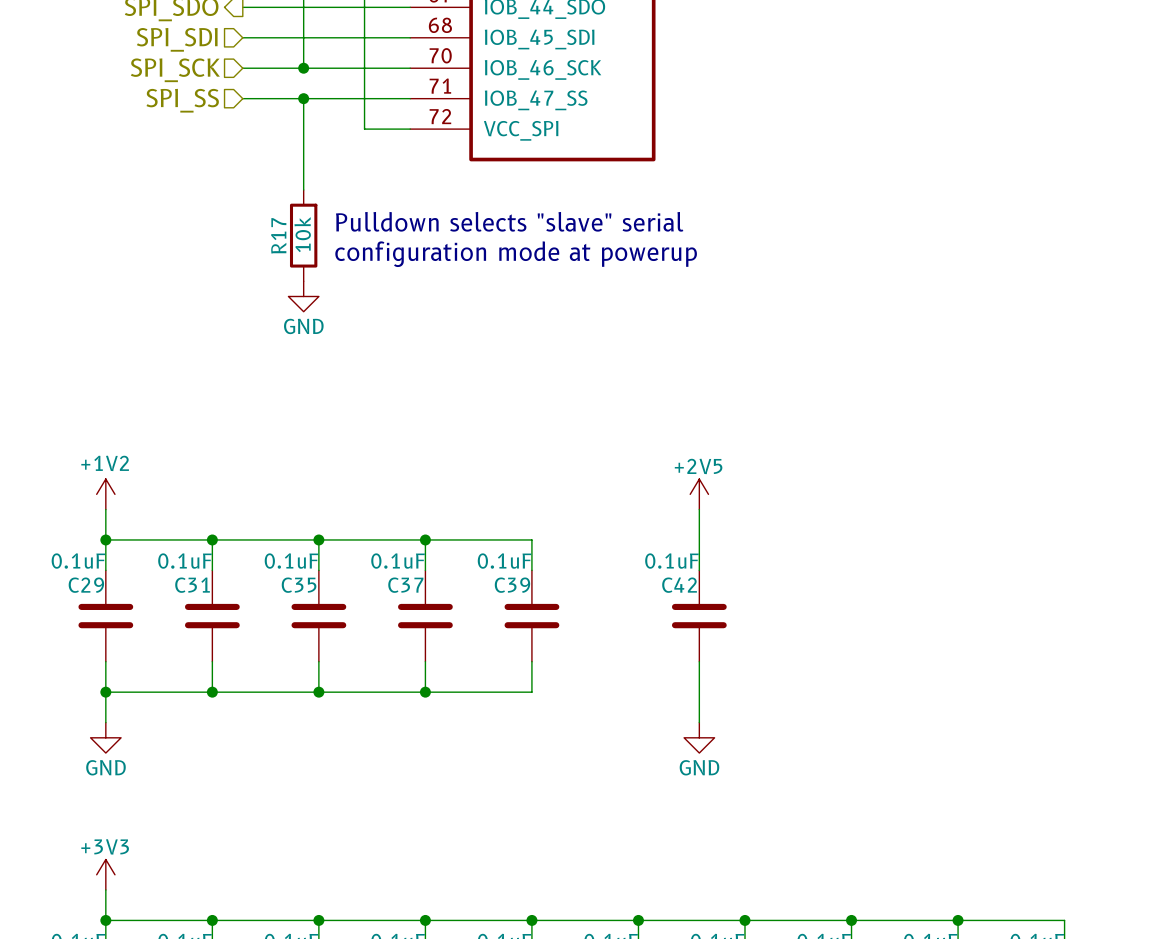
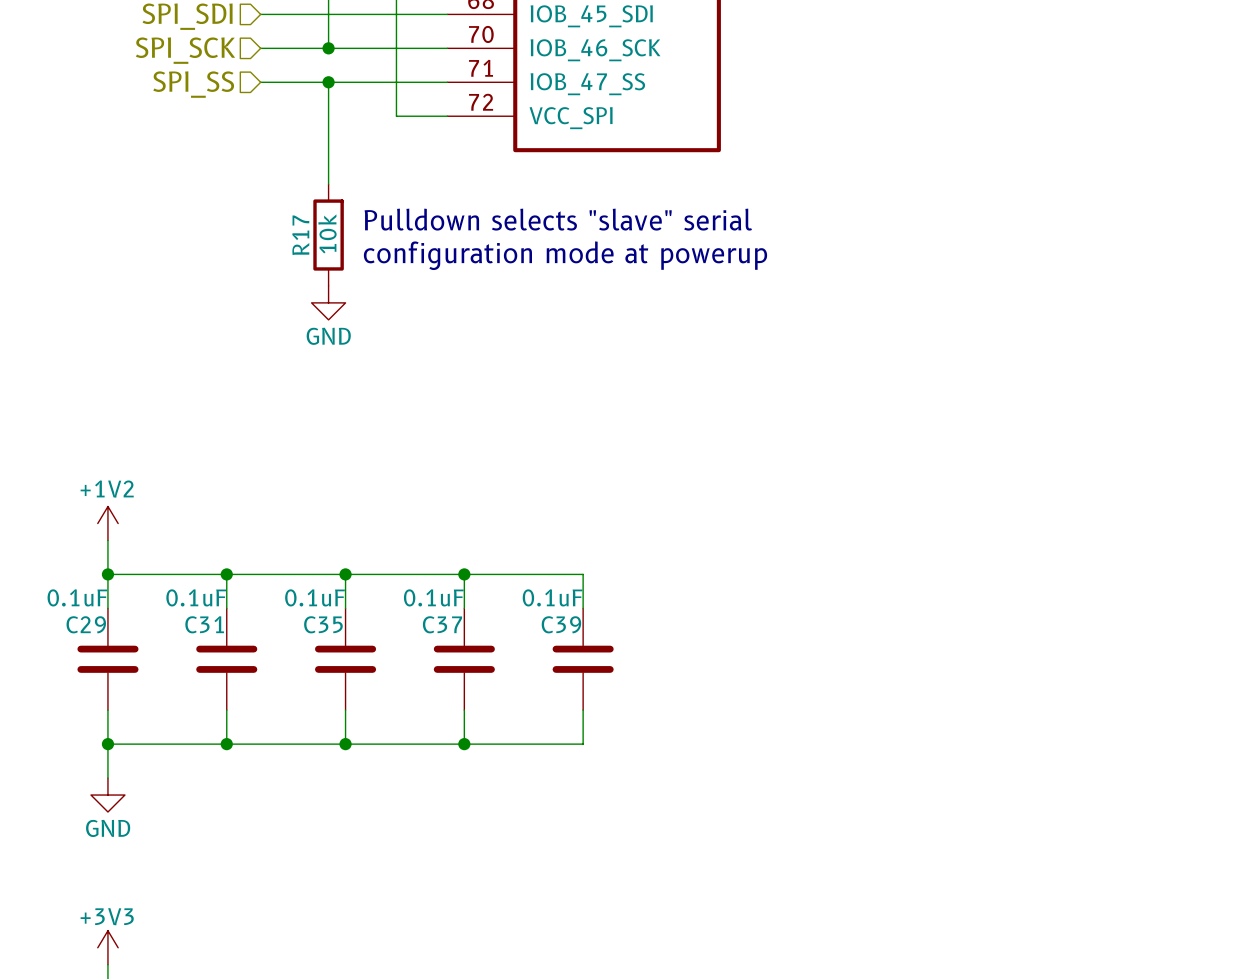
power symbol: +2V5 (699, 494) -> none
wire: (699, 509) (699, 570) -> none
C42: 0.1uF (699, 616) -> none
wire: (699, 661) (699, 722) -> none
power symbol: GND (699, 737) -> none

